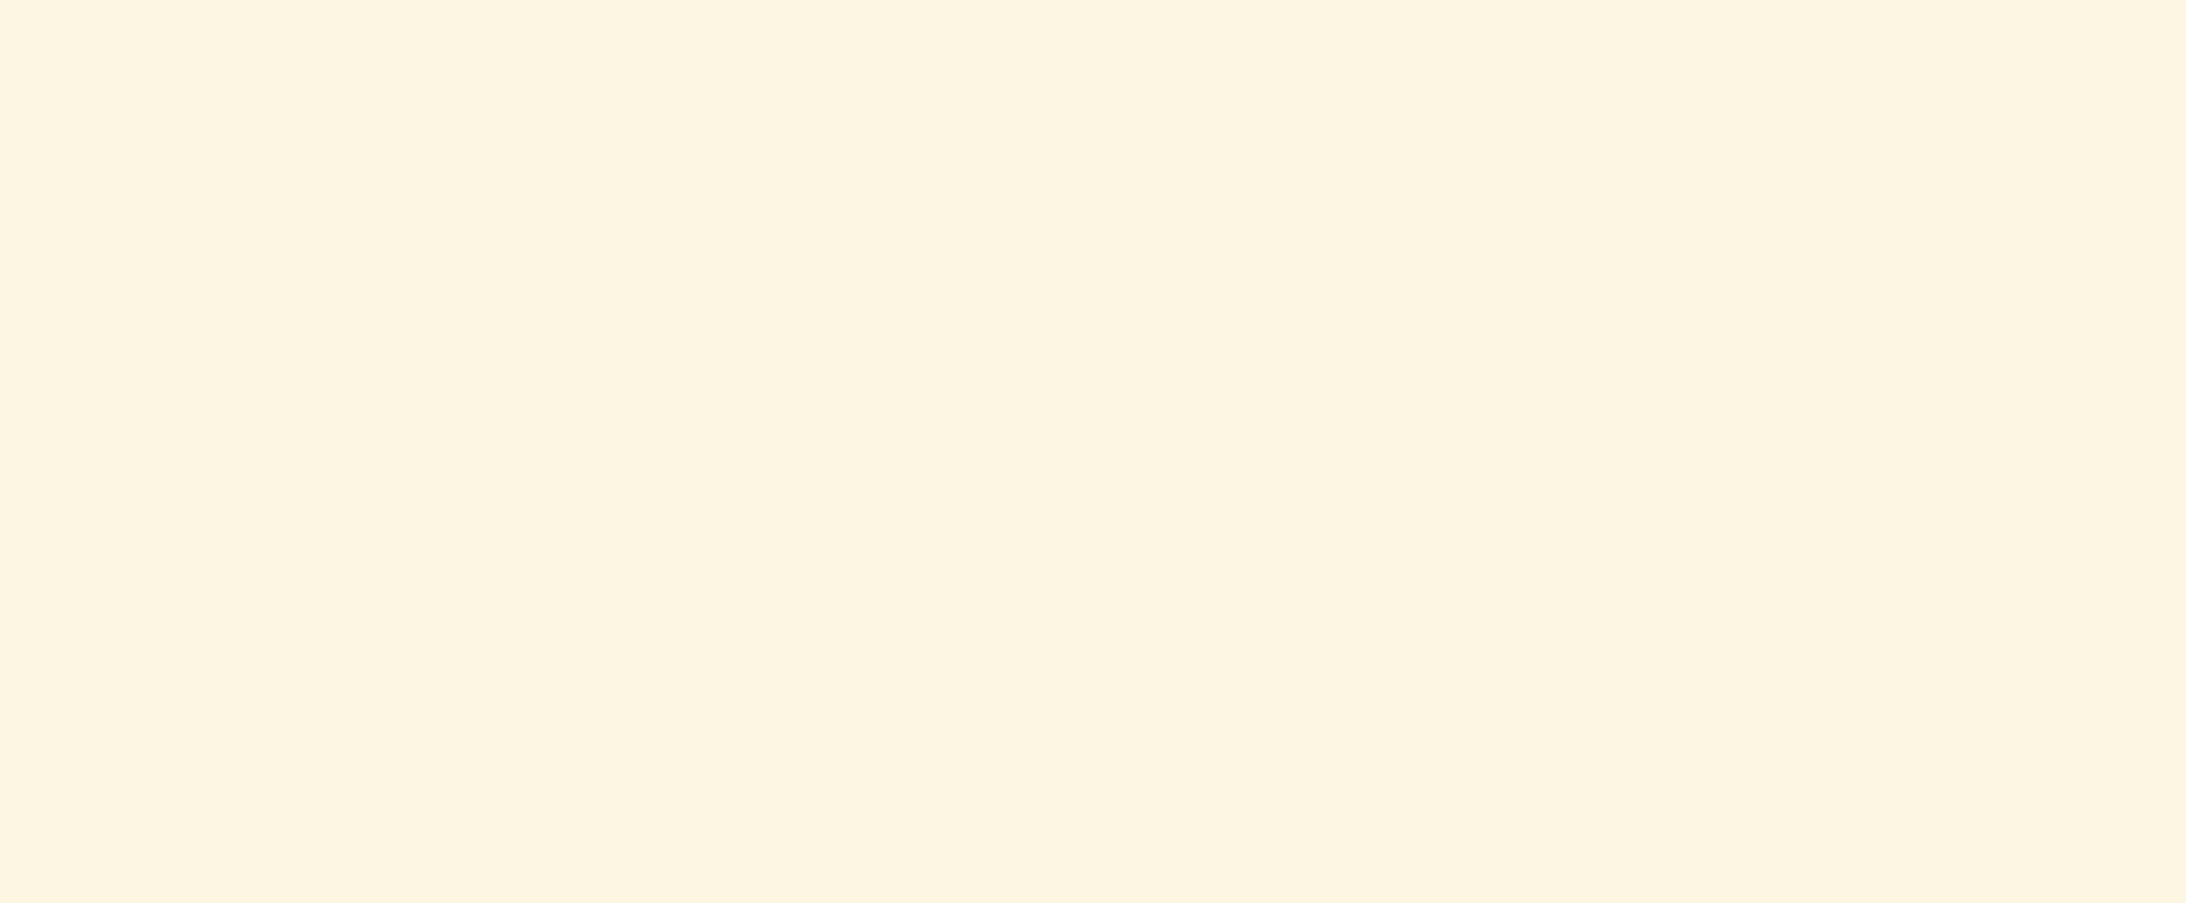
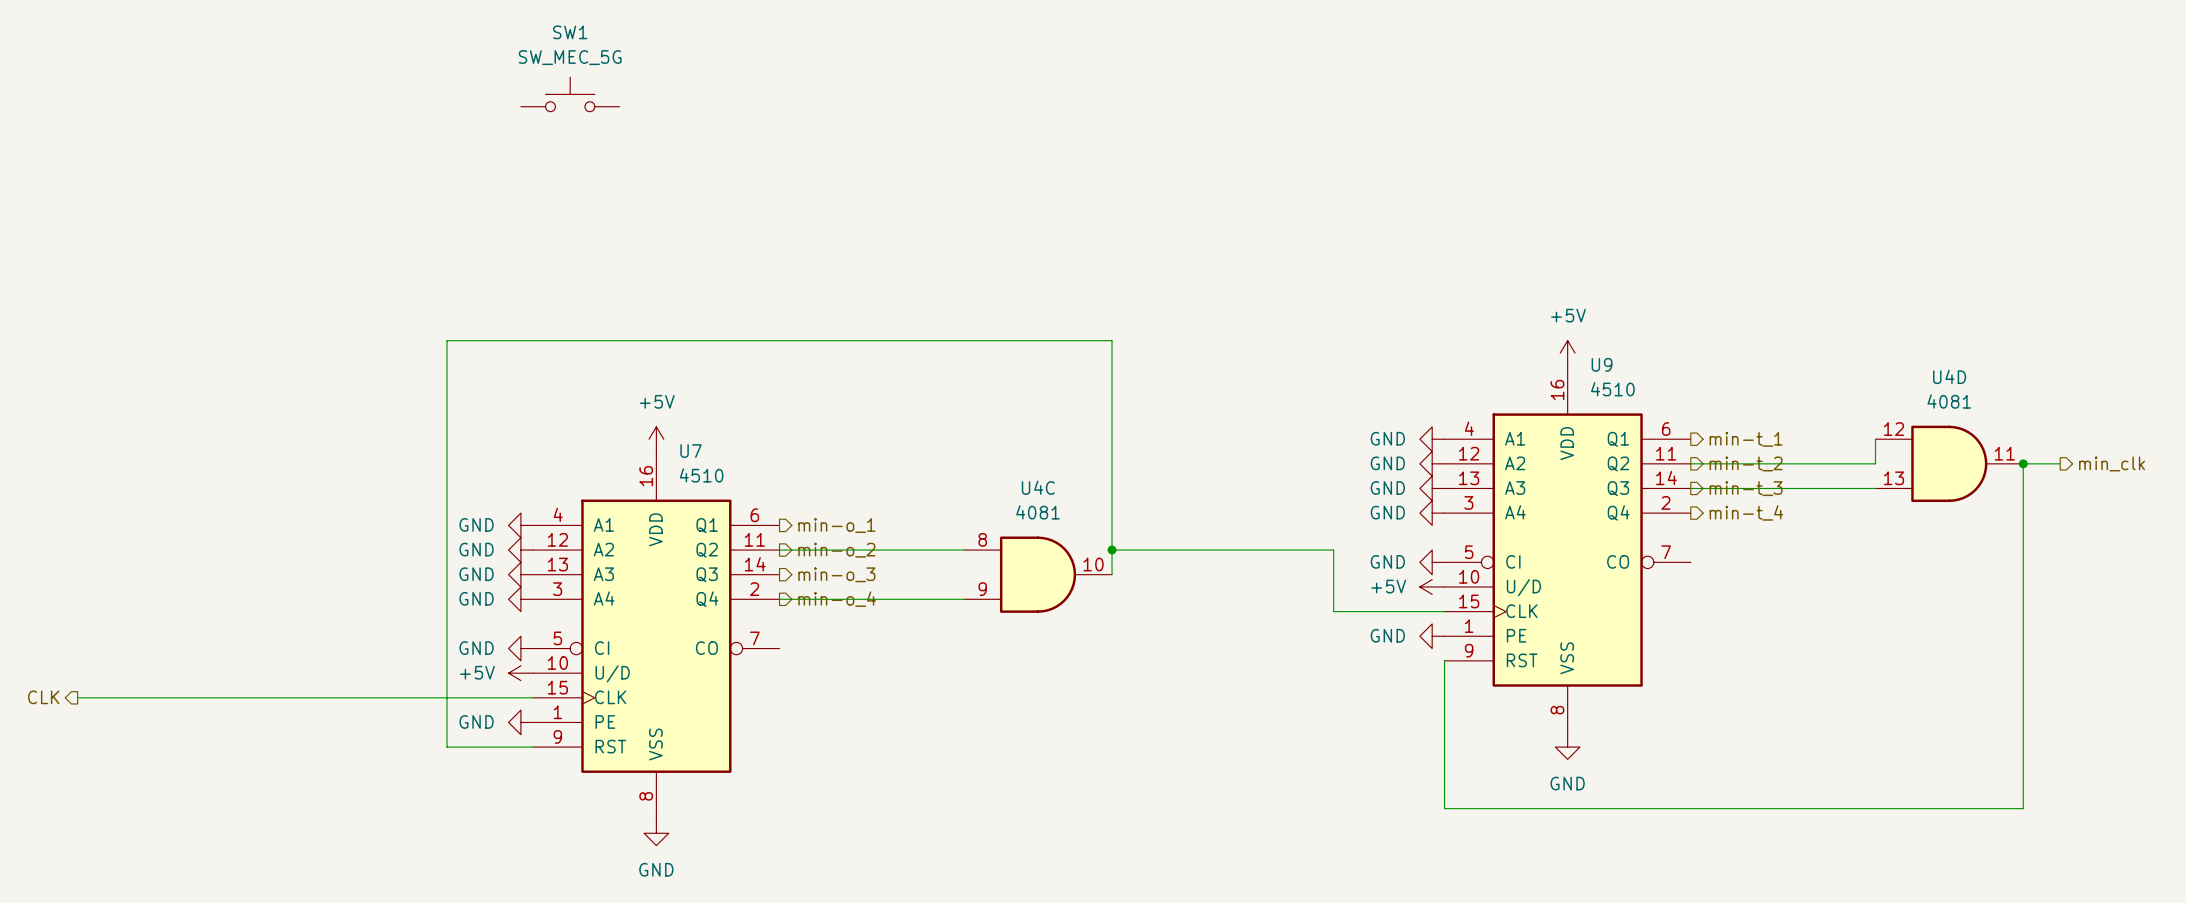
SW1: none -> SW_MEC_5G (570, 94)
power symbol: none -> +5V (1567, 353)
power symbol: none -> +5V (656, 439)
power symbol: none -> GND (1432, 439)
hierarchical label: none -> min-t_1 (1746, 439)
wire: none -> (1875, 439) (1875, 463) (1690, 463)
power symbol: none -> GND (1432, 463)
U4D: none -> 4081 (1949, 463)
junction: none -> (2023, 463)
wire: none -> (2060, 463) (2023, 463) (2023, 808) (1444, 808) (1444, 660)
hierarchical label: none -> min-t_2 (1746, 463)
hierarchical label: none -> min_clk (2112, 463)
power symbol: none -> GND (1432, 488)
wire: none -> (1690, 488) (1875, 488)
hierarchical label: none -> min-t_3 (1746, 488)
power symbol: none -> GND (1432, 513)
hierarchical label: none -> min-t_4 (1746, 512)
power symbol: none -> GND (520, 525)
hierarchical label: none -> min-o_1 (836, 525)
power symbol: none -> GND (520, 550)
wire: none -> (779, 550) (964, 550)
hierarchical label: none -> min-o_2 (836, 550)
wire: none -> (1112, 550) (1333, 550) (1333, 611) (1444, 611)
junction: none -> (1112, 550)
U9: none -> 4510 (1567, 550)
power symbol: none -> GND (1432, 562)
power symbol: none -> GND (520, 574)
U4C: none -> 4081 (1038, 574)
wire: none -> (1112, 574) (1112, 340) (447, 340) (447, 747) (533, 747)
hierarchical label: none -> min-o_3 (836, 574)
power symbol: none -> +5V (1432, 586)
power symbol: none -> GND (520, 599)
wire: none -> (779, 599) (964, 599)
hierarchical label: none -> min-o_4 (837, 599)
U7: none -> 4510 (656, 636)
power symbol: none -> GND (1432, 636)
power symbol: none -> GND (520, 648)
power symbol: none -> +5V (520, 673)
hierarchical label: none -> CLK (43, 697)
wire: none -> (77, 697) (533, 697)
power symbol: none -> GND (520, 722)
power symbol: none -> GND (1567, 747)
power symbol: none -> GND (656, 833)

